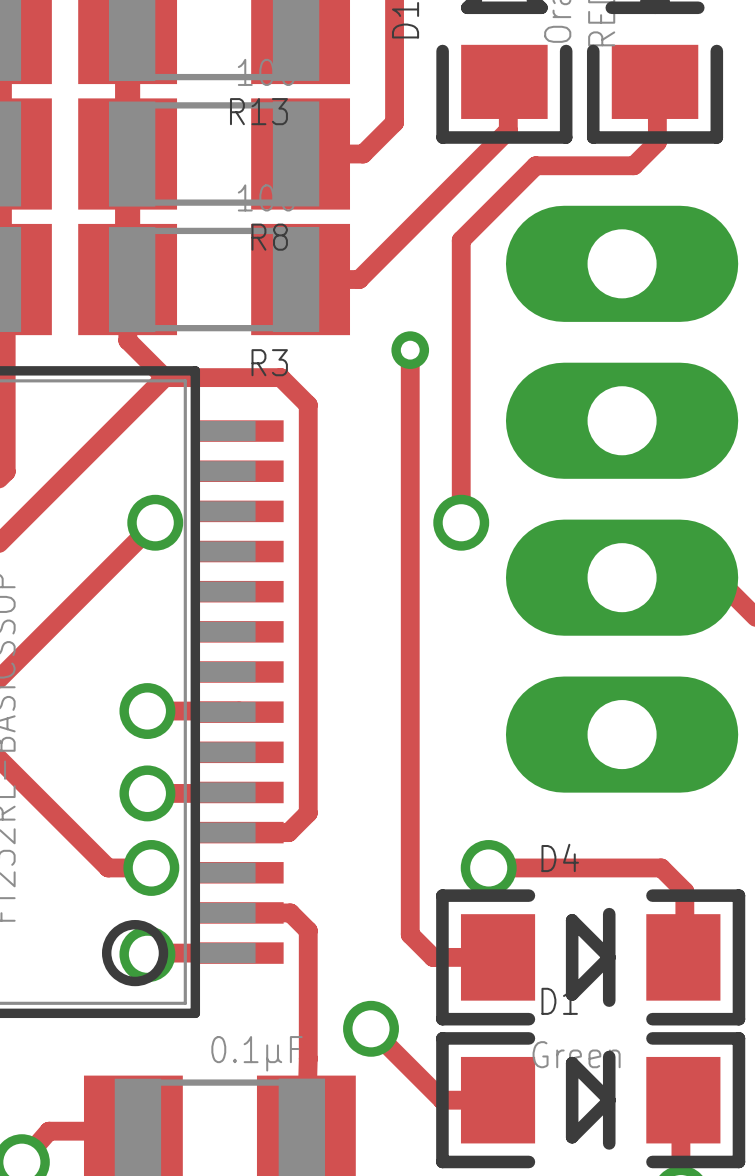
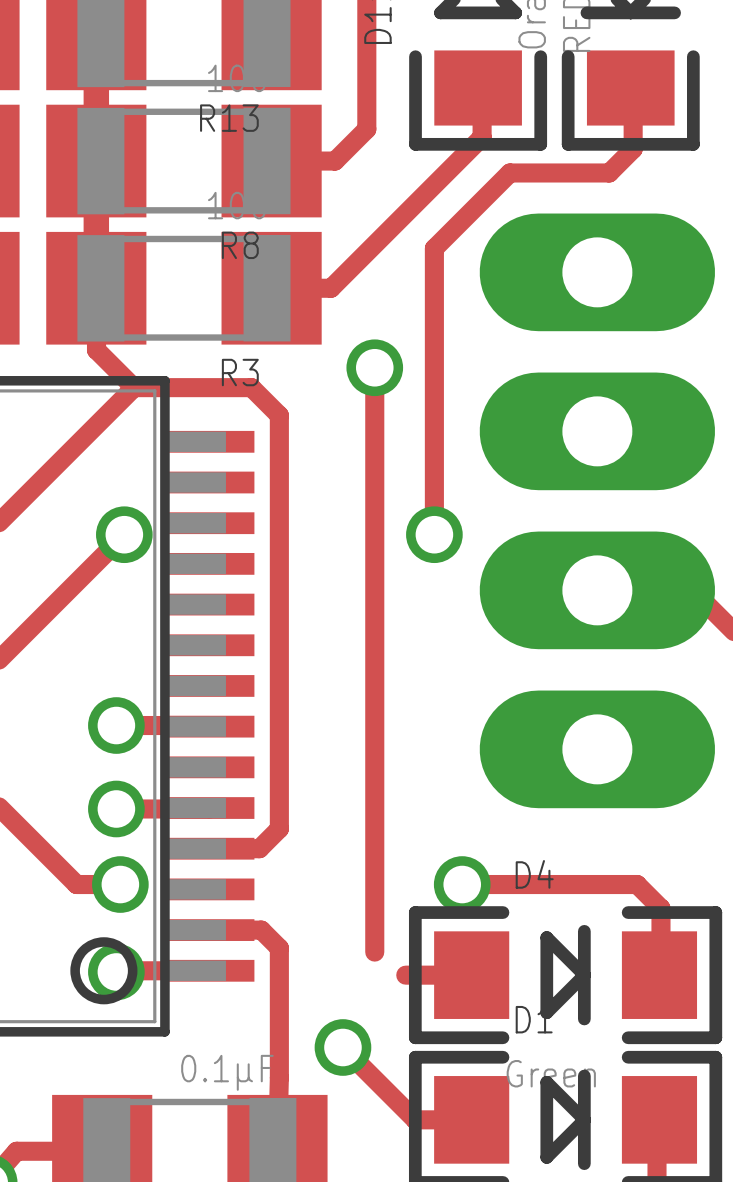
via size: [391, 331, 430, 369] -> [346, 339, 404, 397]
track: (410, 350) (410, 934) (433, 957) -> none
track: none -> (374, 367) (374, 952)

